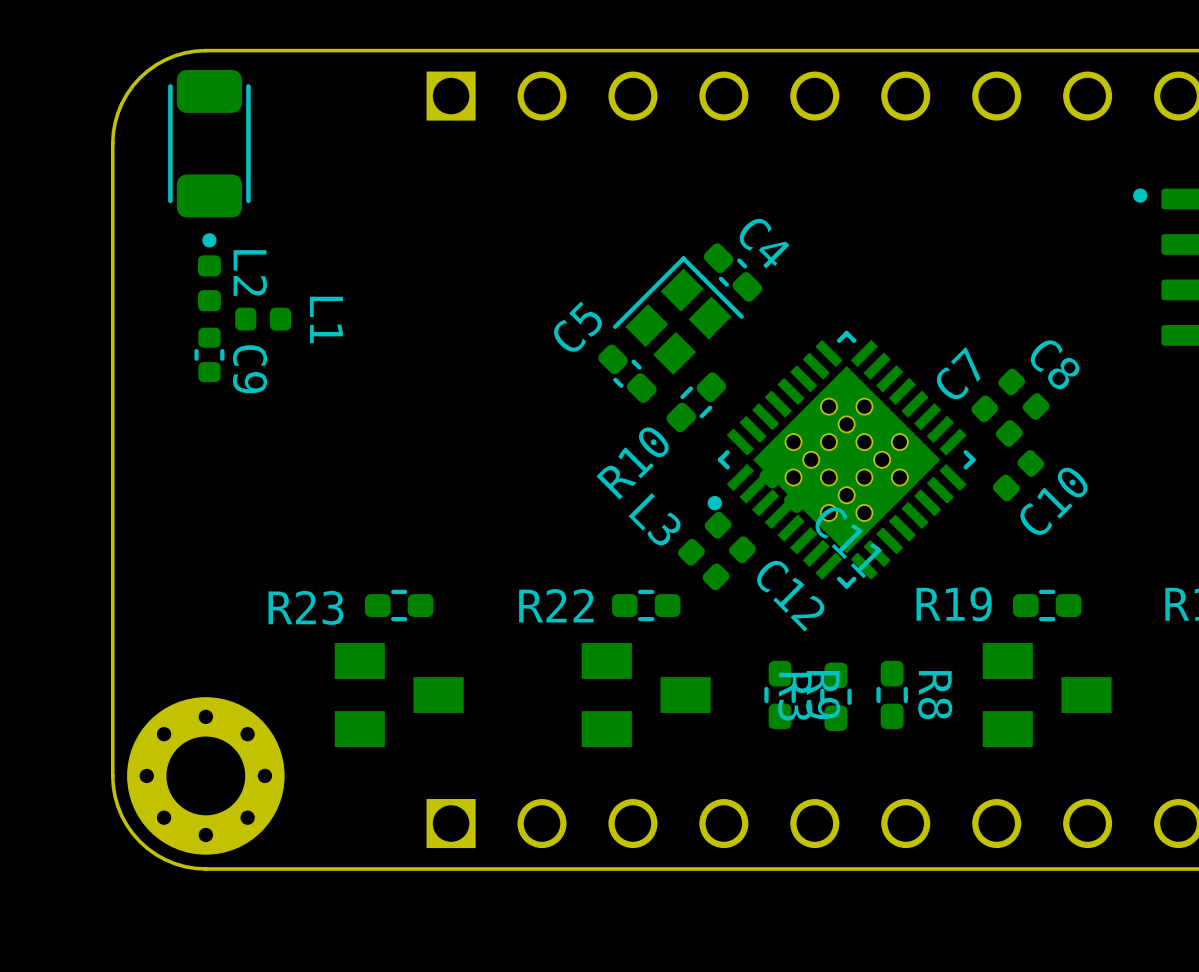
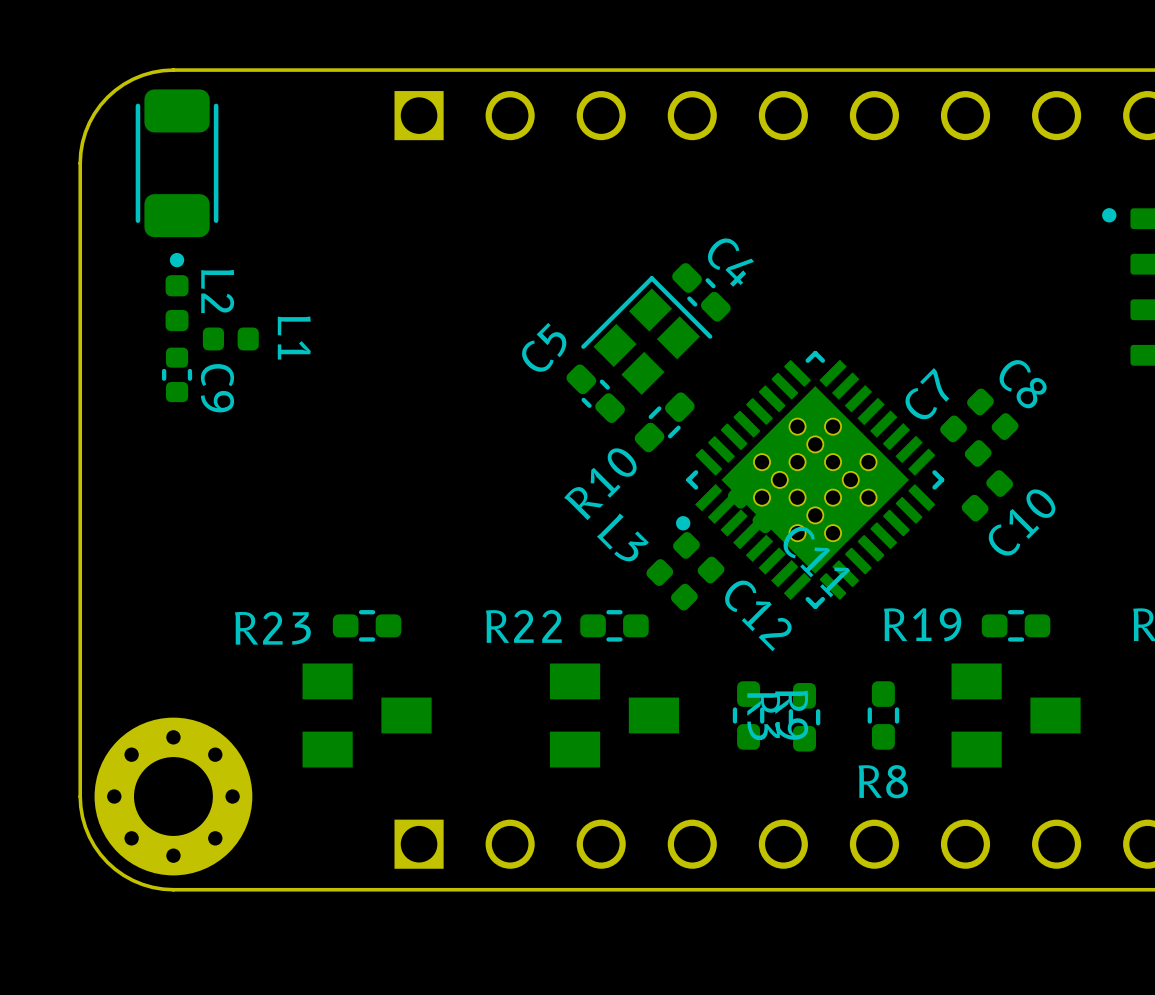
R8 position: (892, 695) -> (883, 715)
R8 name rotation: 0° (935, 695) -> 90° counterclockwise (883, 781)

